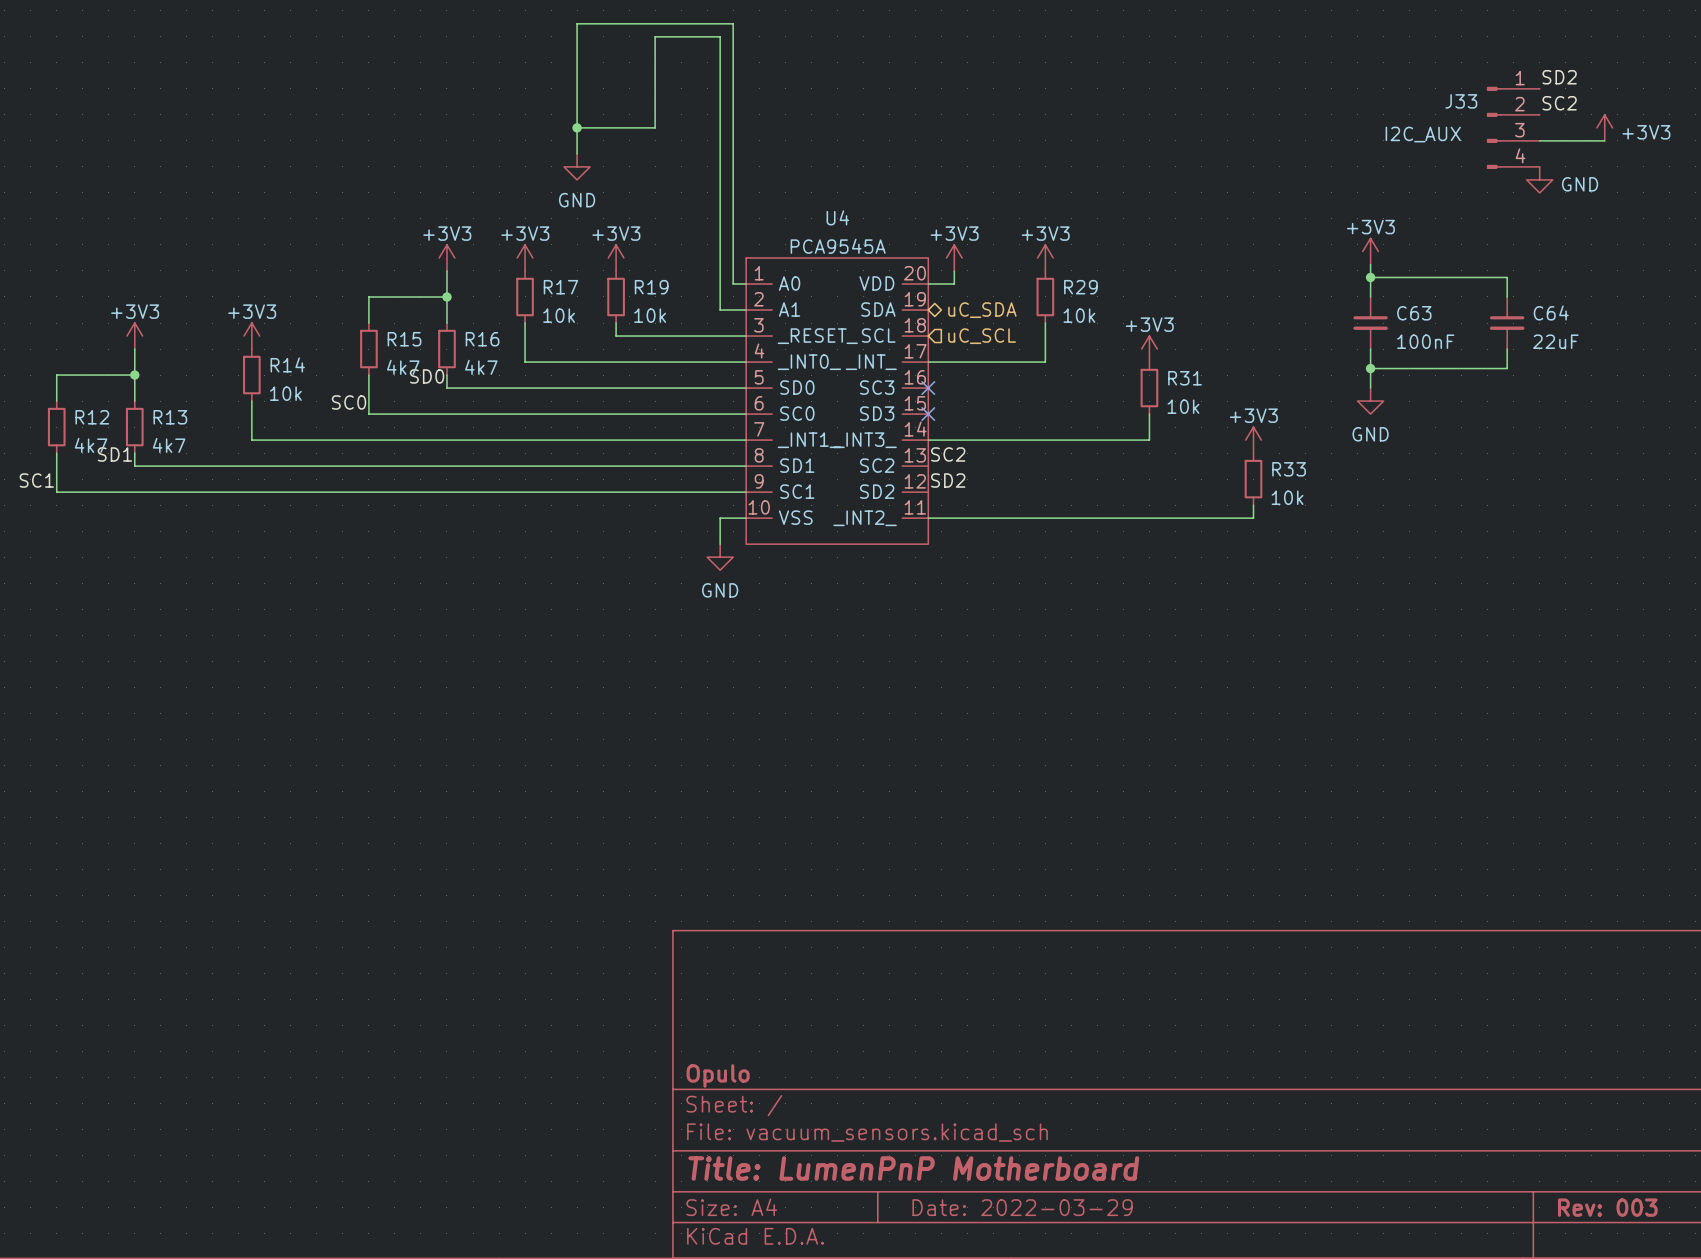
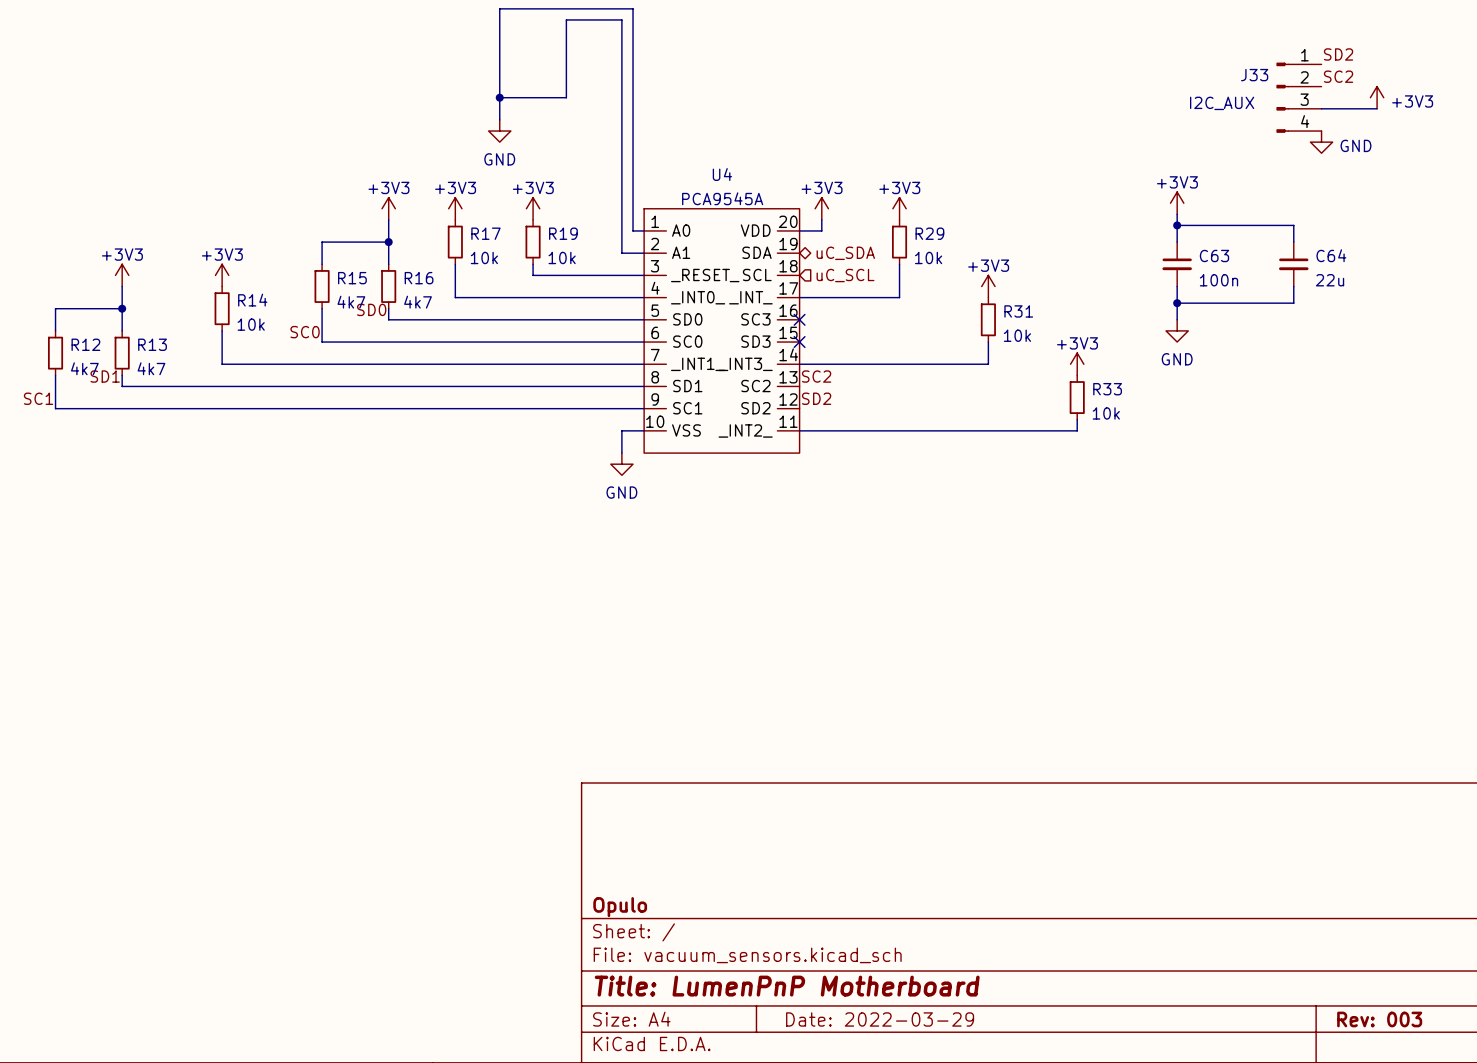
C63 value: 100nF (1425, 341) -> 100n (1218, 280)
C64 value: 22uF (1555, 341) -> 22u (1330, 280)

